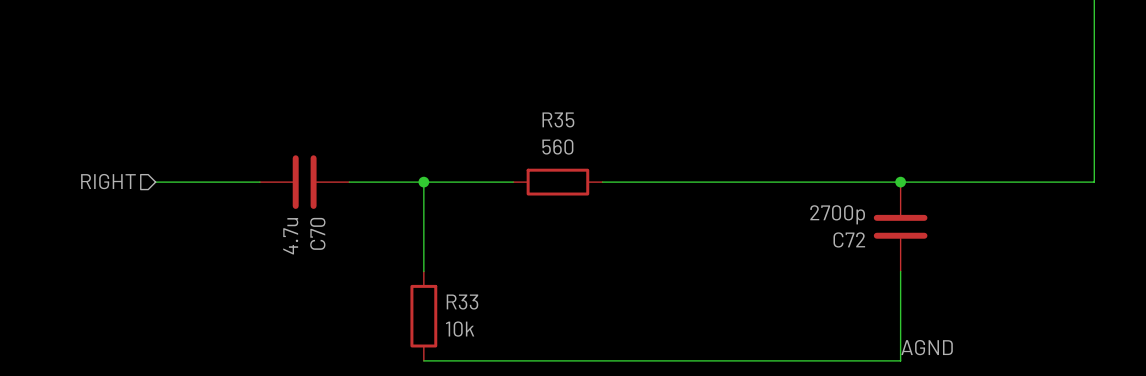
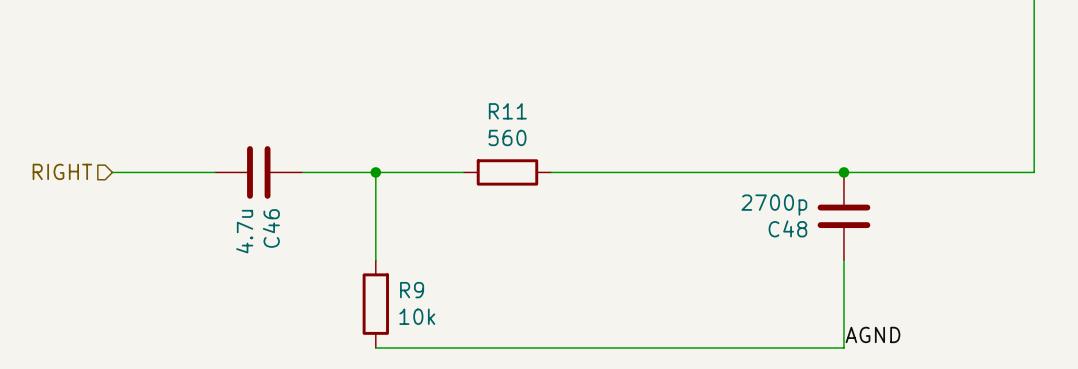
R35 name: R35 (558, 119) -> R11 (507, 111)
C70 name: C70 (317, 233) -> C46 (271, 228)
C72 name: C72 (849, 239) -> C48 (787, 228)
R33 name: R33 (462, 302) -> R9 (412, 290)

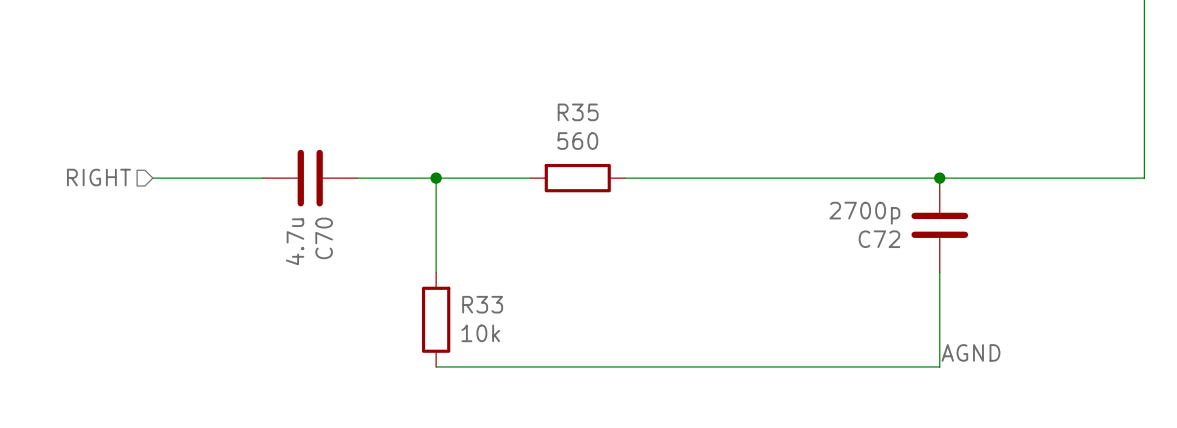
R11 name: R11 (507, 111) -> R35 (578, 112)
C46 name: C46 (271, 228) -> C70 (324, 238)
C48 name: C48 (787, 228) -> C72 (879, 239)
R9 name: R9 (412, 290) -> R33 (482, 304)

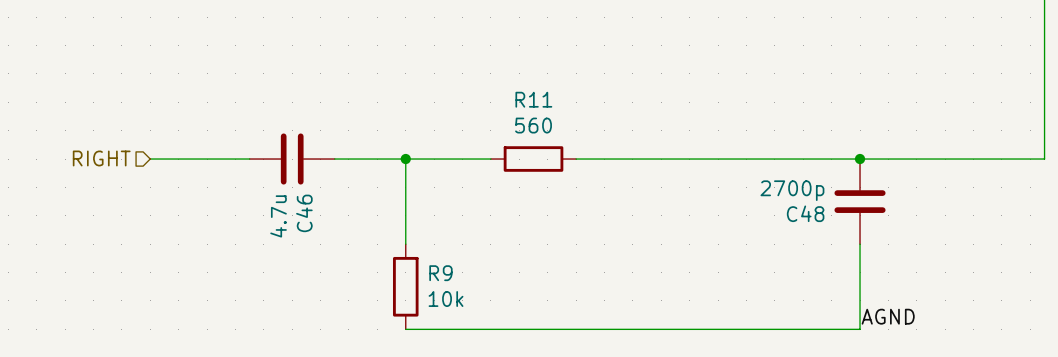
R35 name: R35 (578, 112) -> R11 (533, 99)
C70 name: C70 (324, 238) -> C46 (304, 213)
C72 name: C72 (879, 239) -> C48 (805, 213)
R33 name: R33 (482, 304) -> R9 (440, 273)

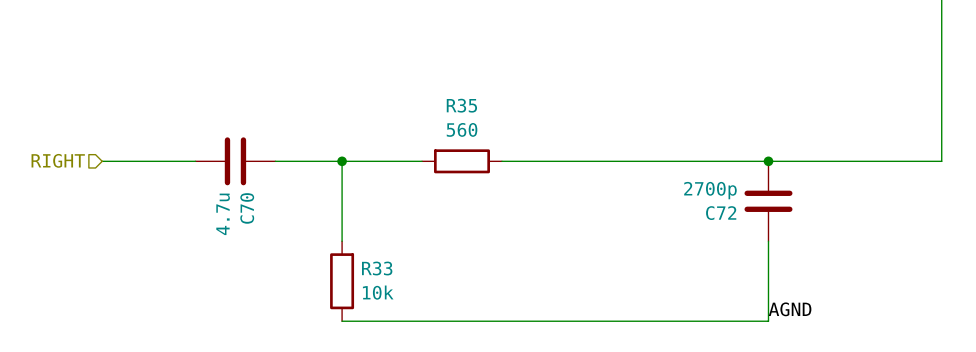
R11 name: R11 (533, 99) -> R35 (461, 105)
C46 name: C46 (304, 213) -> C70 (247, 208)
C48 name: C48 (805, 213) -> C72 (721, 213)
R9 name: R9 (440, 273) -> R33 (377, 268)

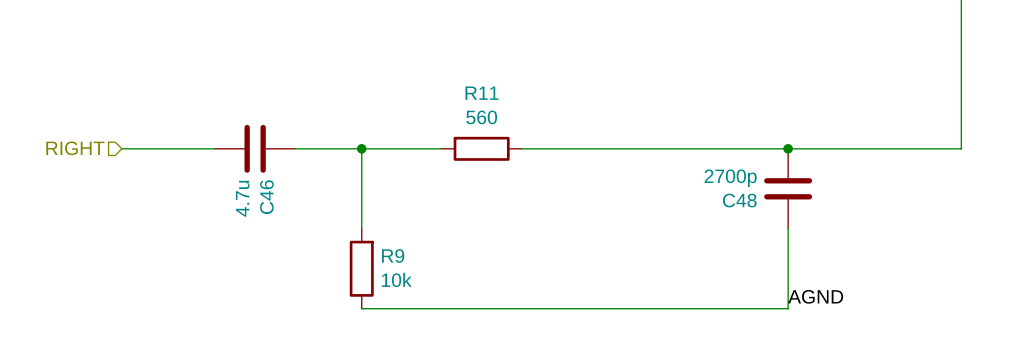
R35 name: R35 (461, 105) -> R11 (481, 93)
C70 name: C70 (247, 208) -> C46 (266, 197)
C72 name: C72 (721, 213) -> C48 (739, 200)
R33 name: R33 (377, 268) -> R9 (393, 255)

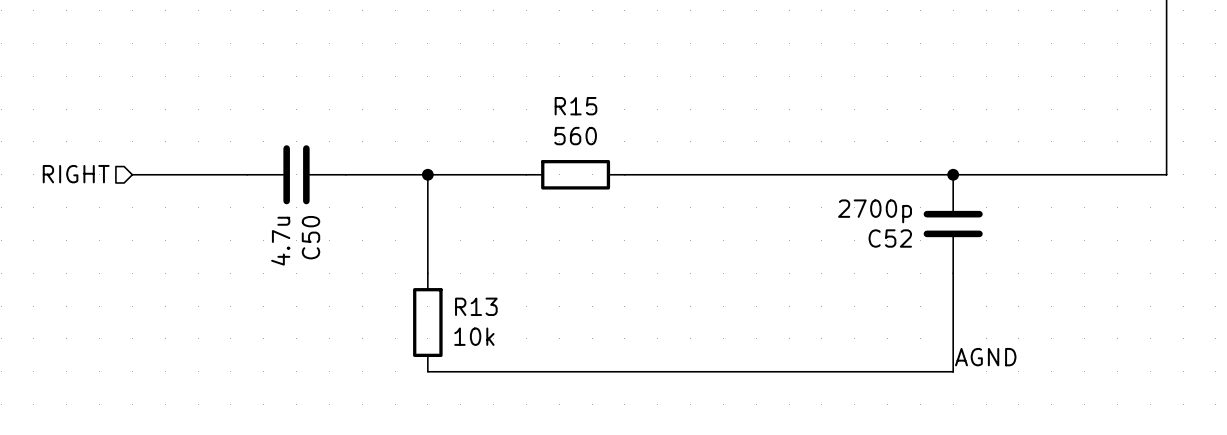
R11 name: R11 (481, 93) -> R15 (575, 106)
C46 name: C46 (266, 197) -> C50 (311, 237)
C48 name: C48 (739, 200) -> C52 (890, 238)
R9 name: R9 (393, 255) -> R13 (476, 306)

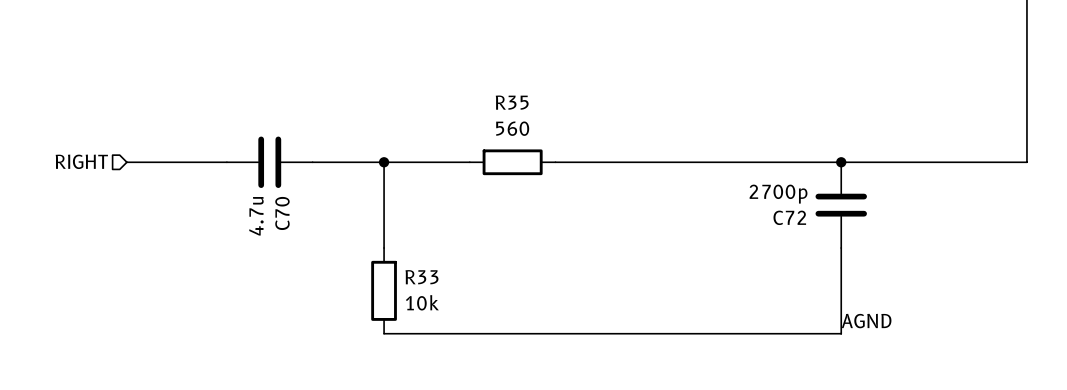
R15 name: R15 (575, 106) -> R35 (512, 102)
C50 name: C50 (311, 237) -> C70 (282, 213)
C52 name: C52 (890, 238) -> C72 (789, 217)
R13 name: R13 (476, 306) -> R33 (421, 277)

